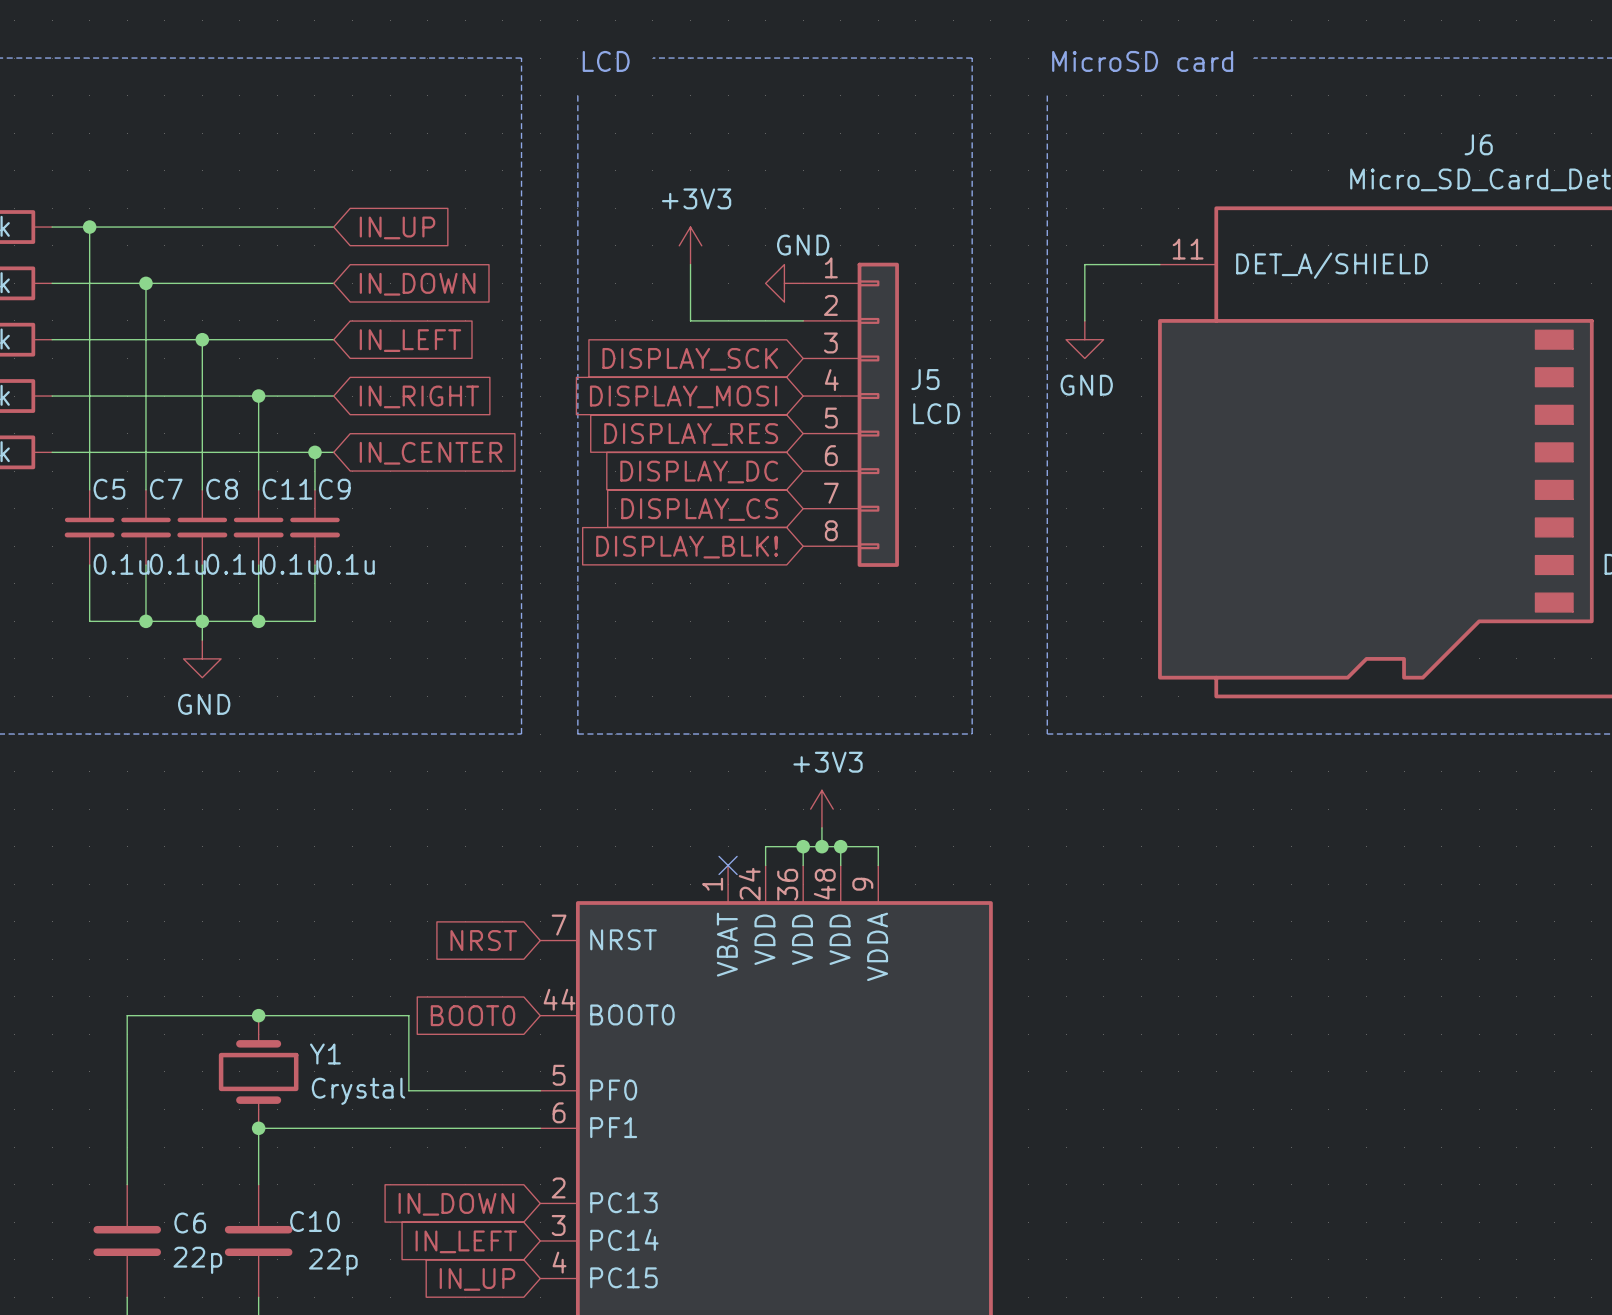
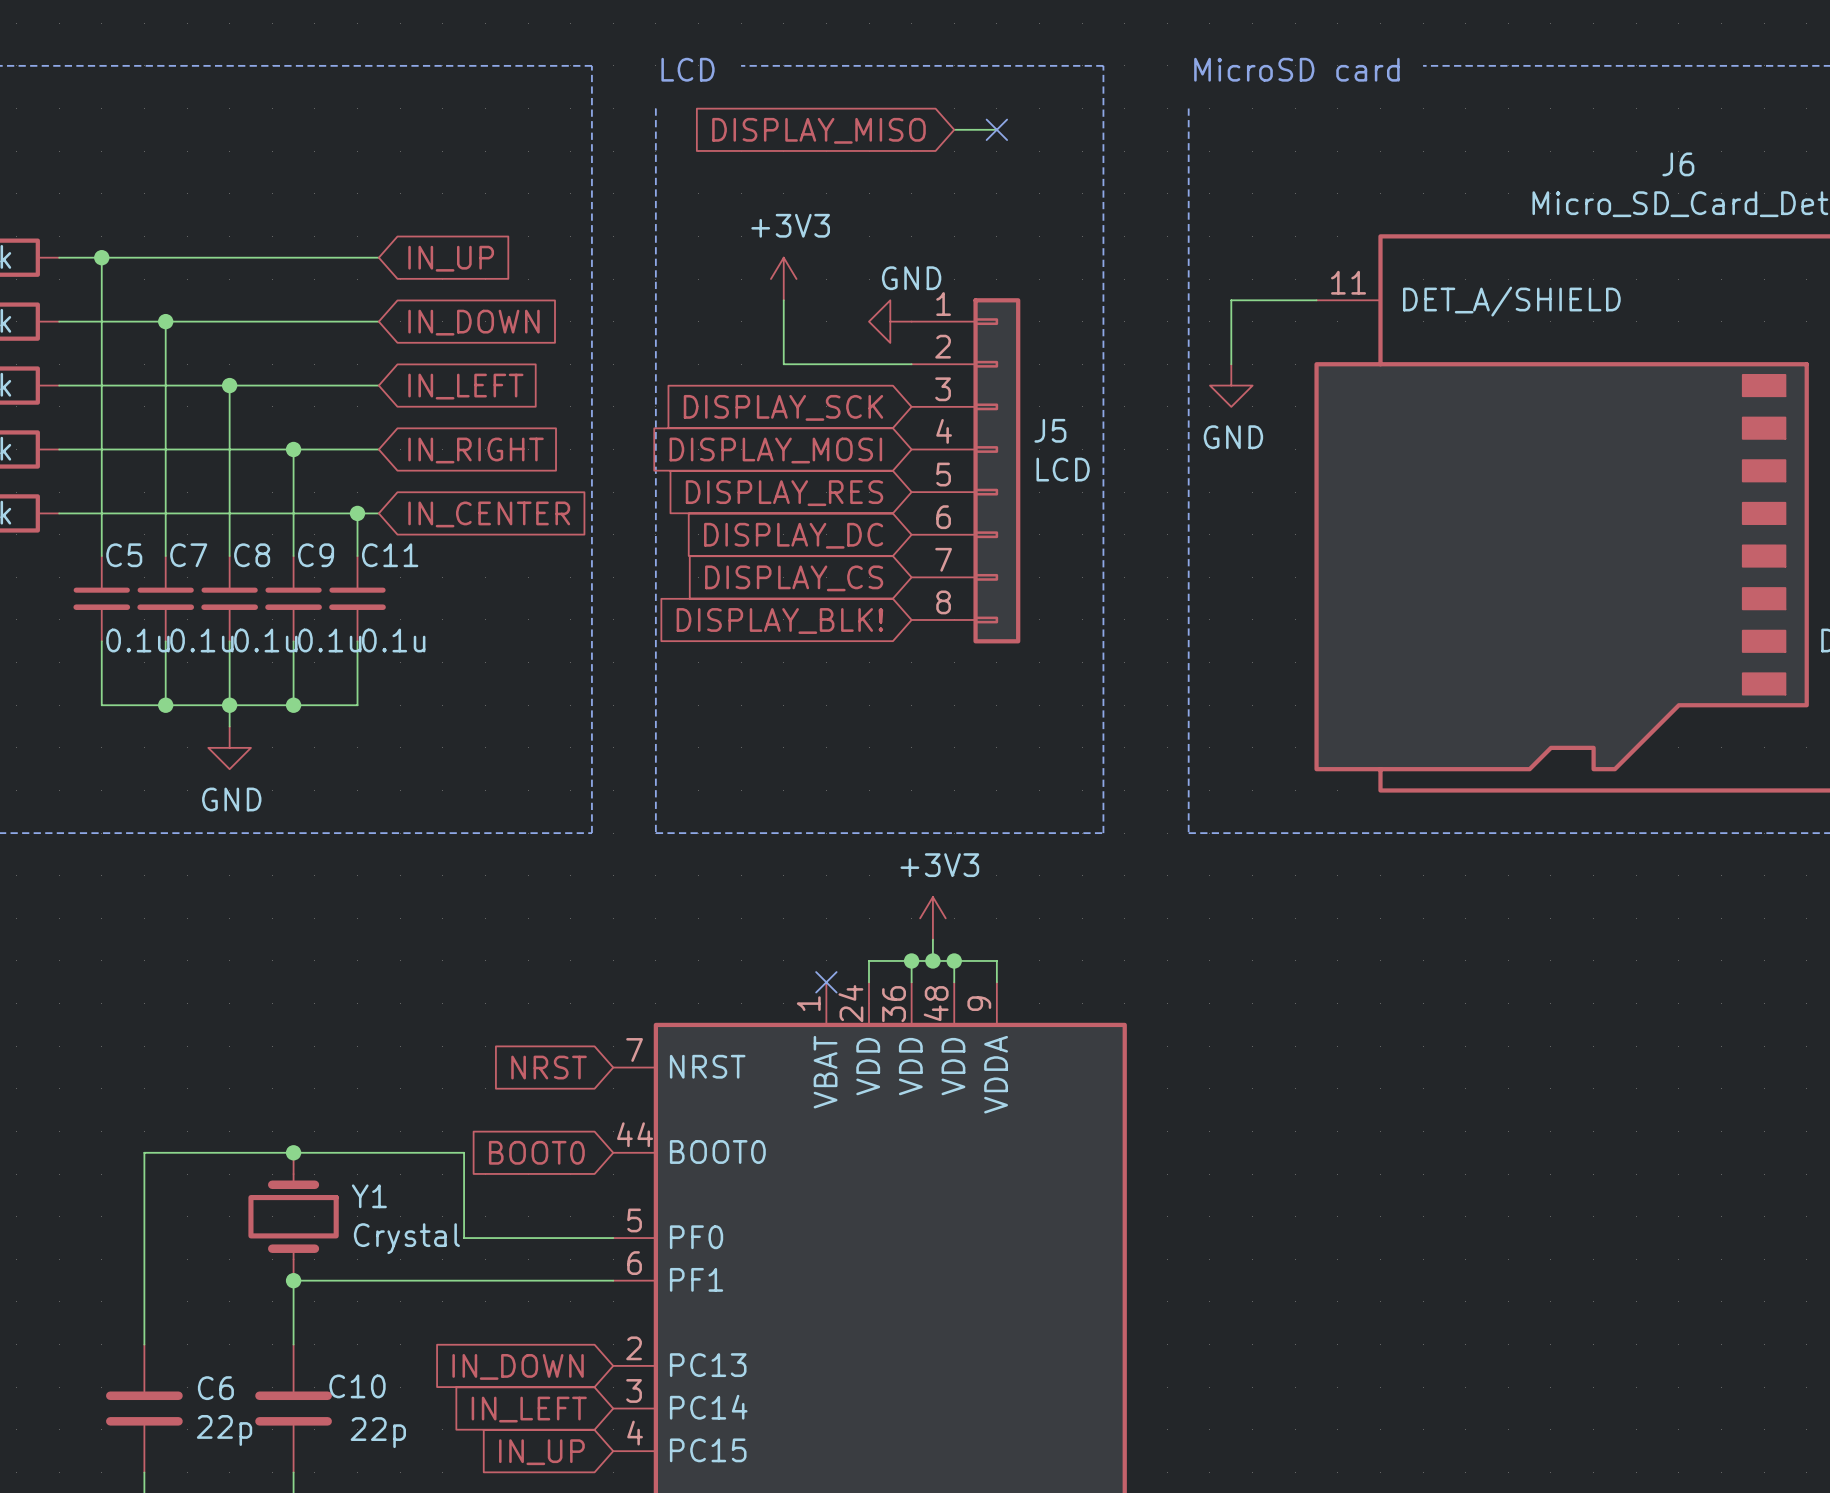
wire: none -> (954, 129) (996, 129)
no-connect mark: none -> (996, 129)
global label: none -> DISPLAY_MISO (818, 130)
C11 name: C11 (287, 489) -> C9 (316, 555)
C9 name: C9 (334, 489) -> C11 (390, 555)

